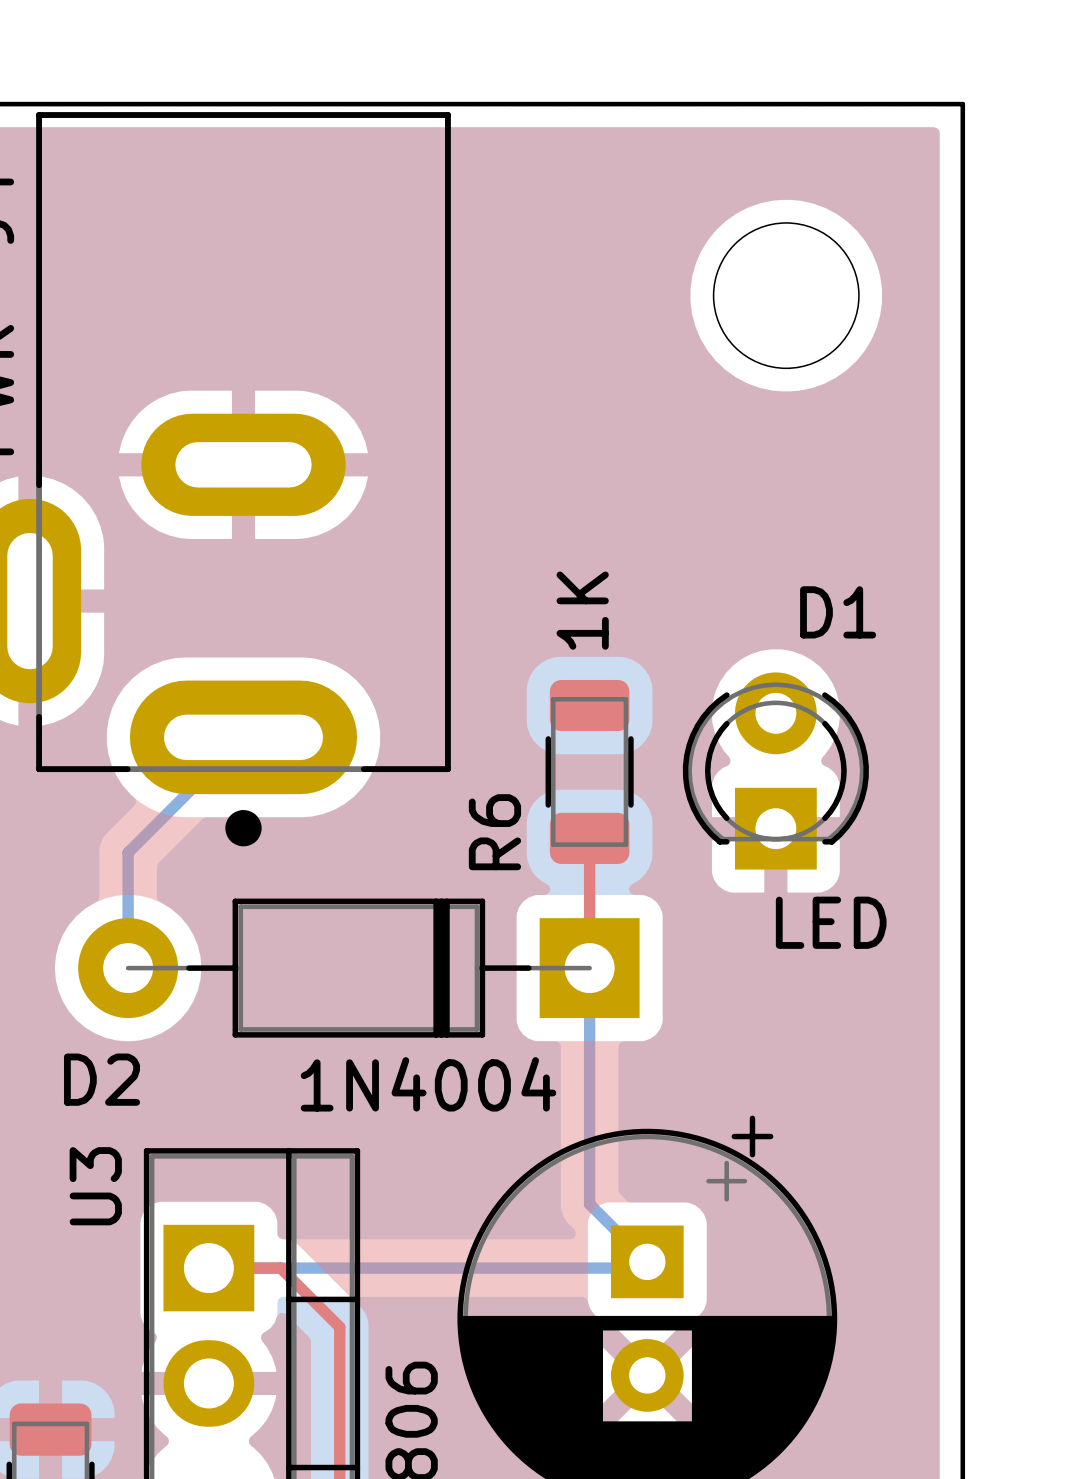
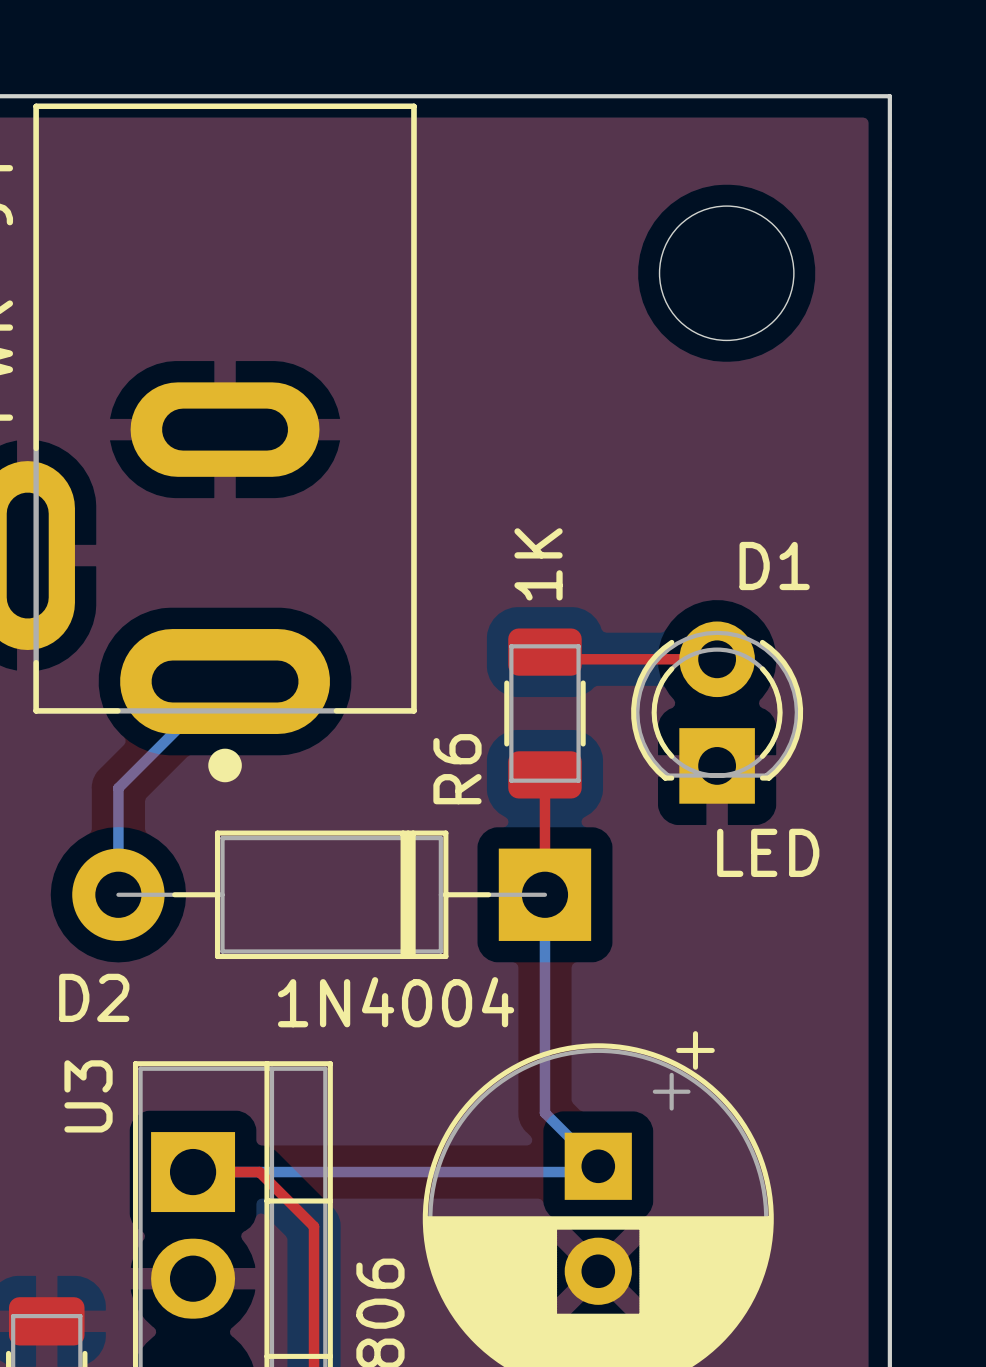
top track: none -> (544, 652) (552, 659) (717, 659)

